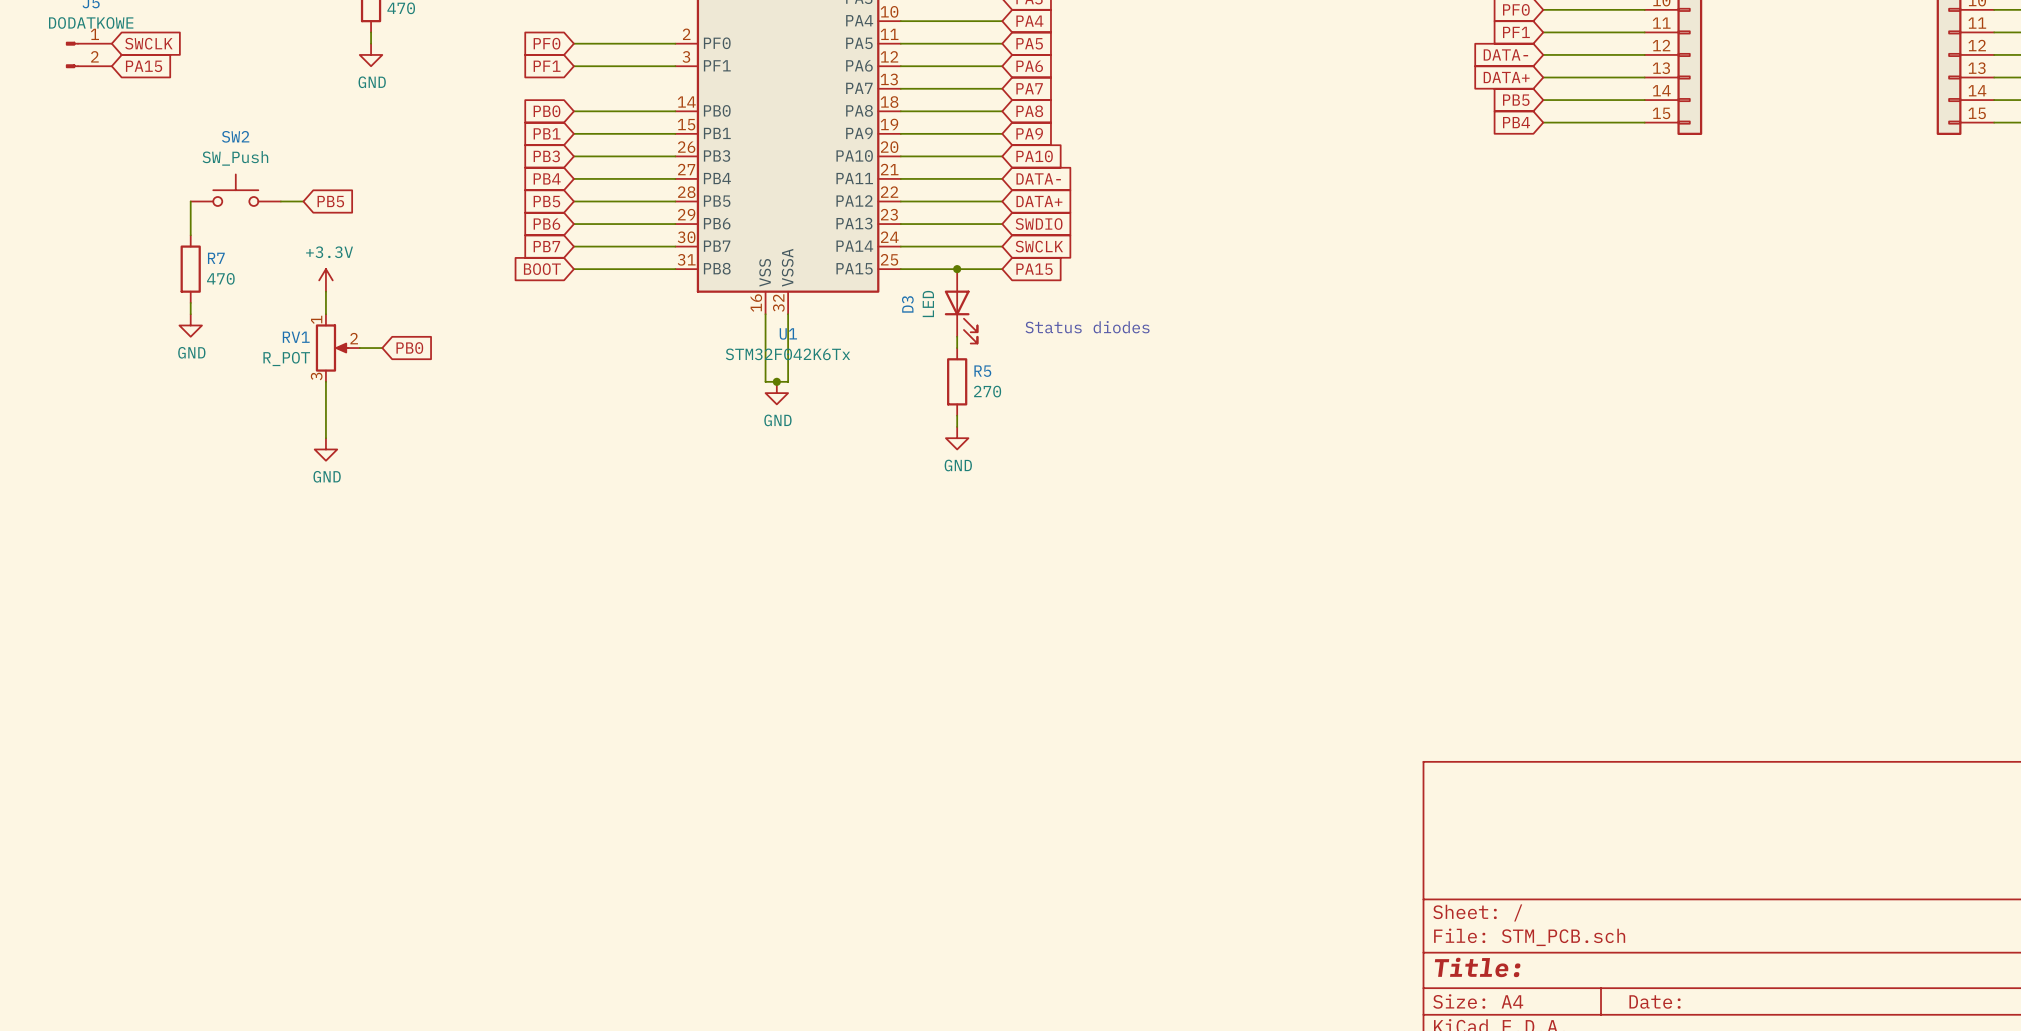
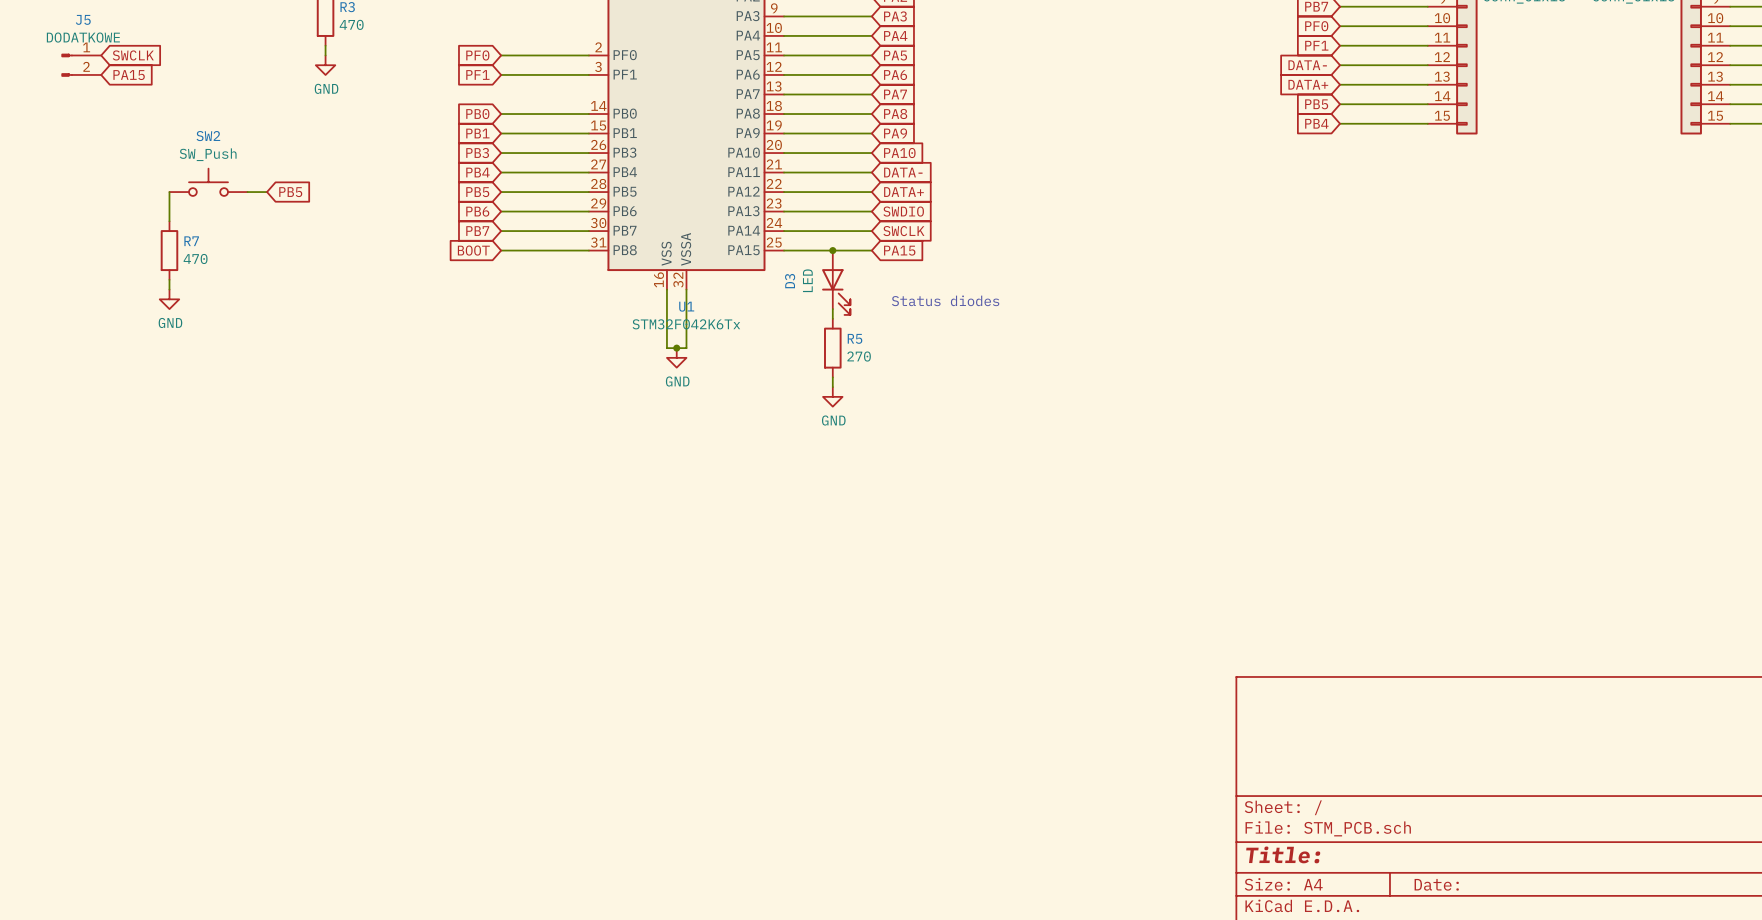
power symbol: +3.3V (325, 280) -> none
wire: (325, 291) (325, 314) -> none
RV1: R_POT (337, 348) -> none
wire: (359, 348) (382, 348) -> none
global label: PB0 (409, 348) -> none
wire: (325, 381) (325, 438) -> none
power symbol: GND (325, 449) -> none

